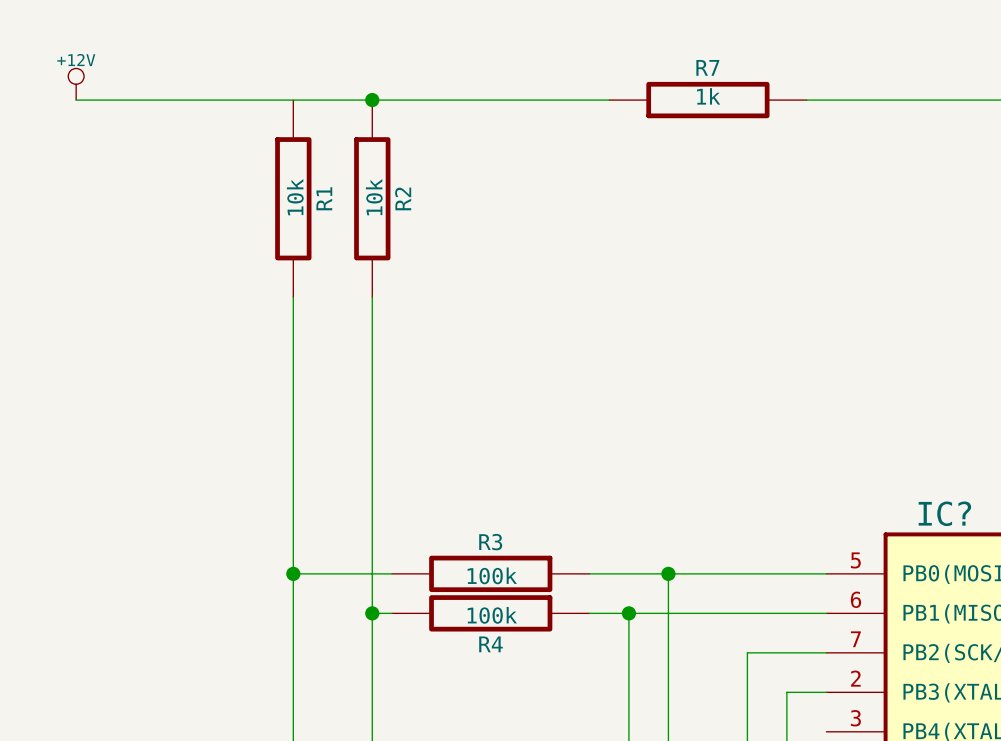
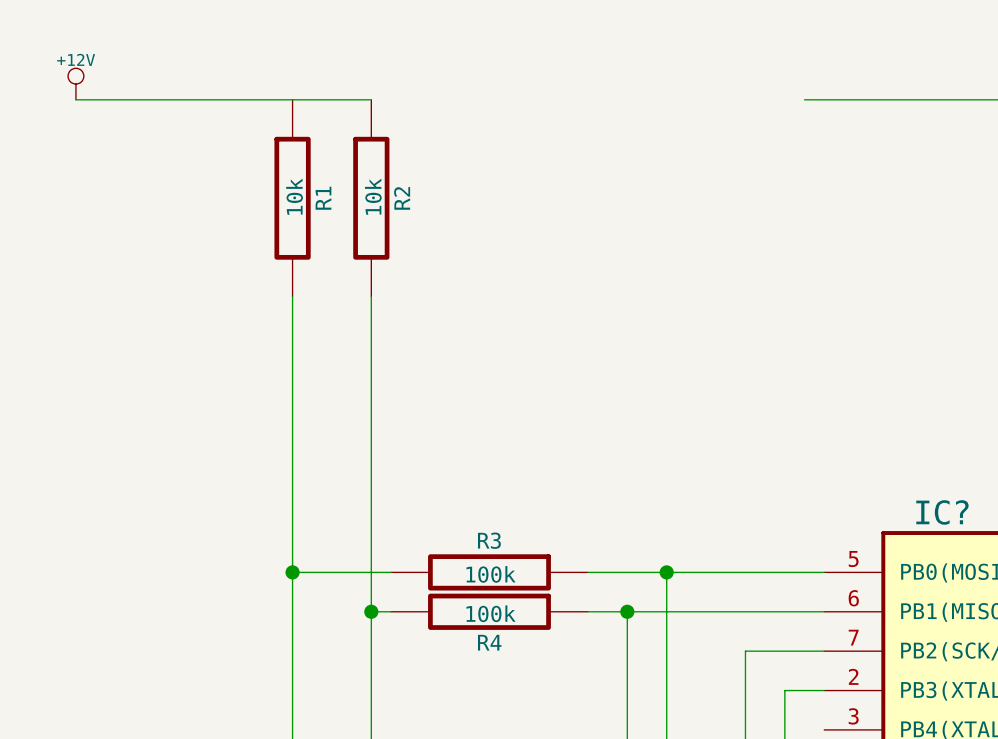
wire: (372, 100) (609, 100) -> none
junction: (372, 100) -> none
R7: 1k (707, 100) -> none

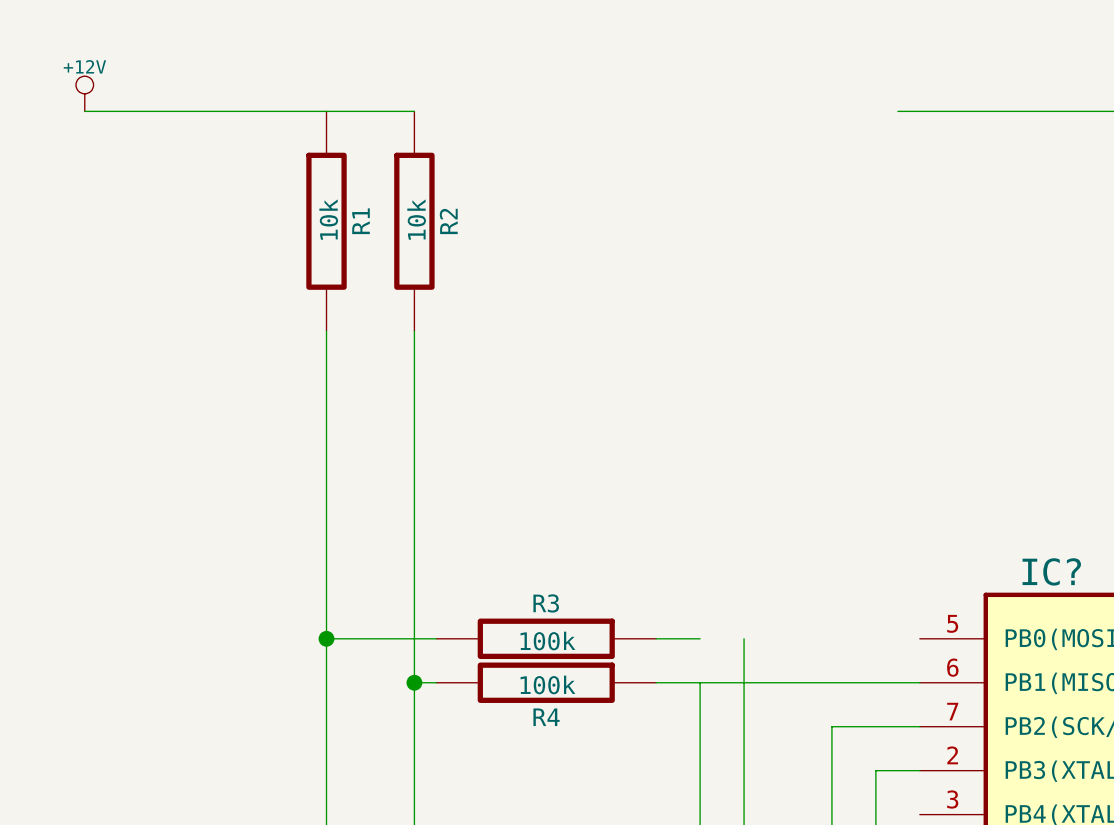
wire: (627, 572) (824, 572) -> none
junction: (666, 572) -> none
junction: (627, 611) -> none

